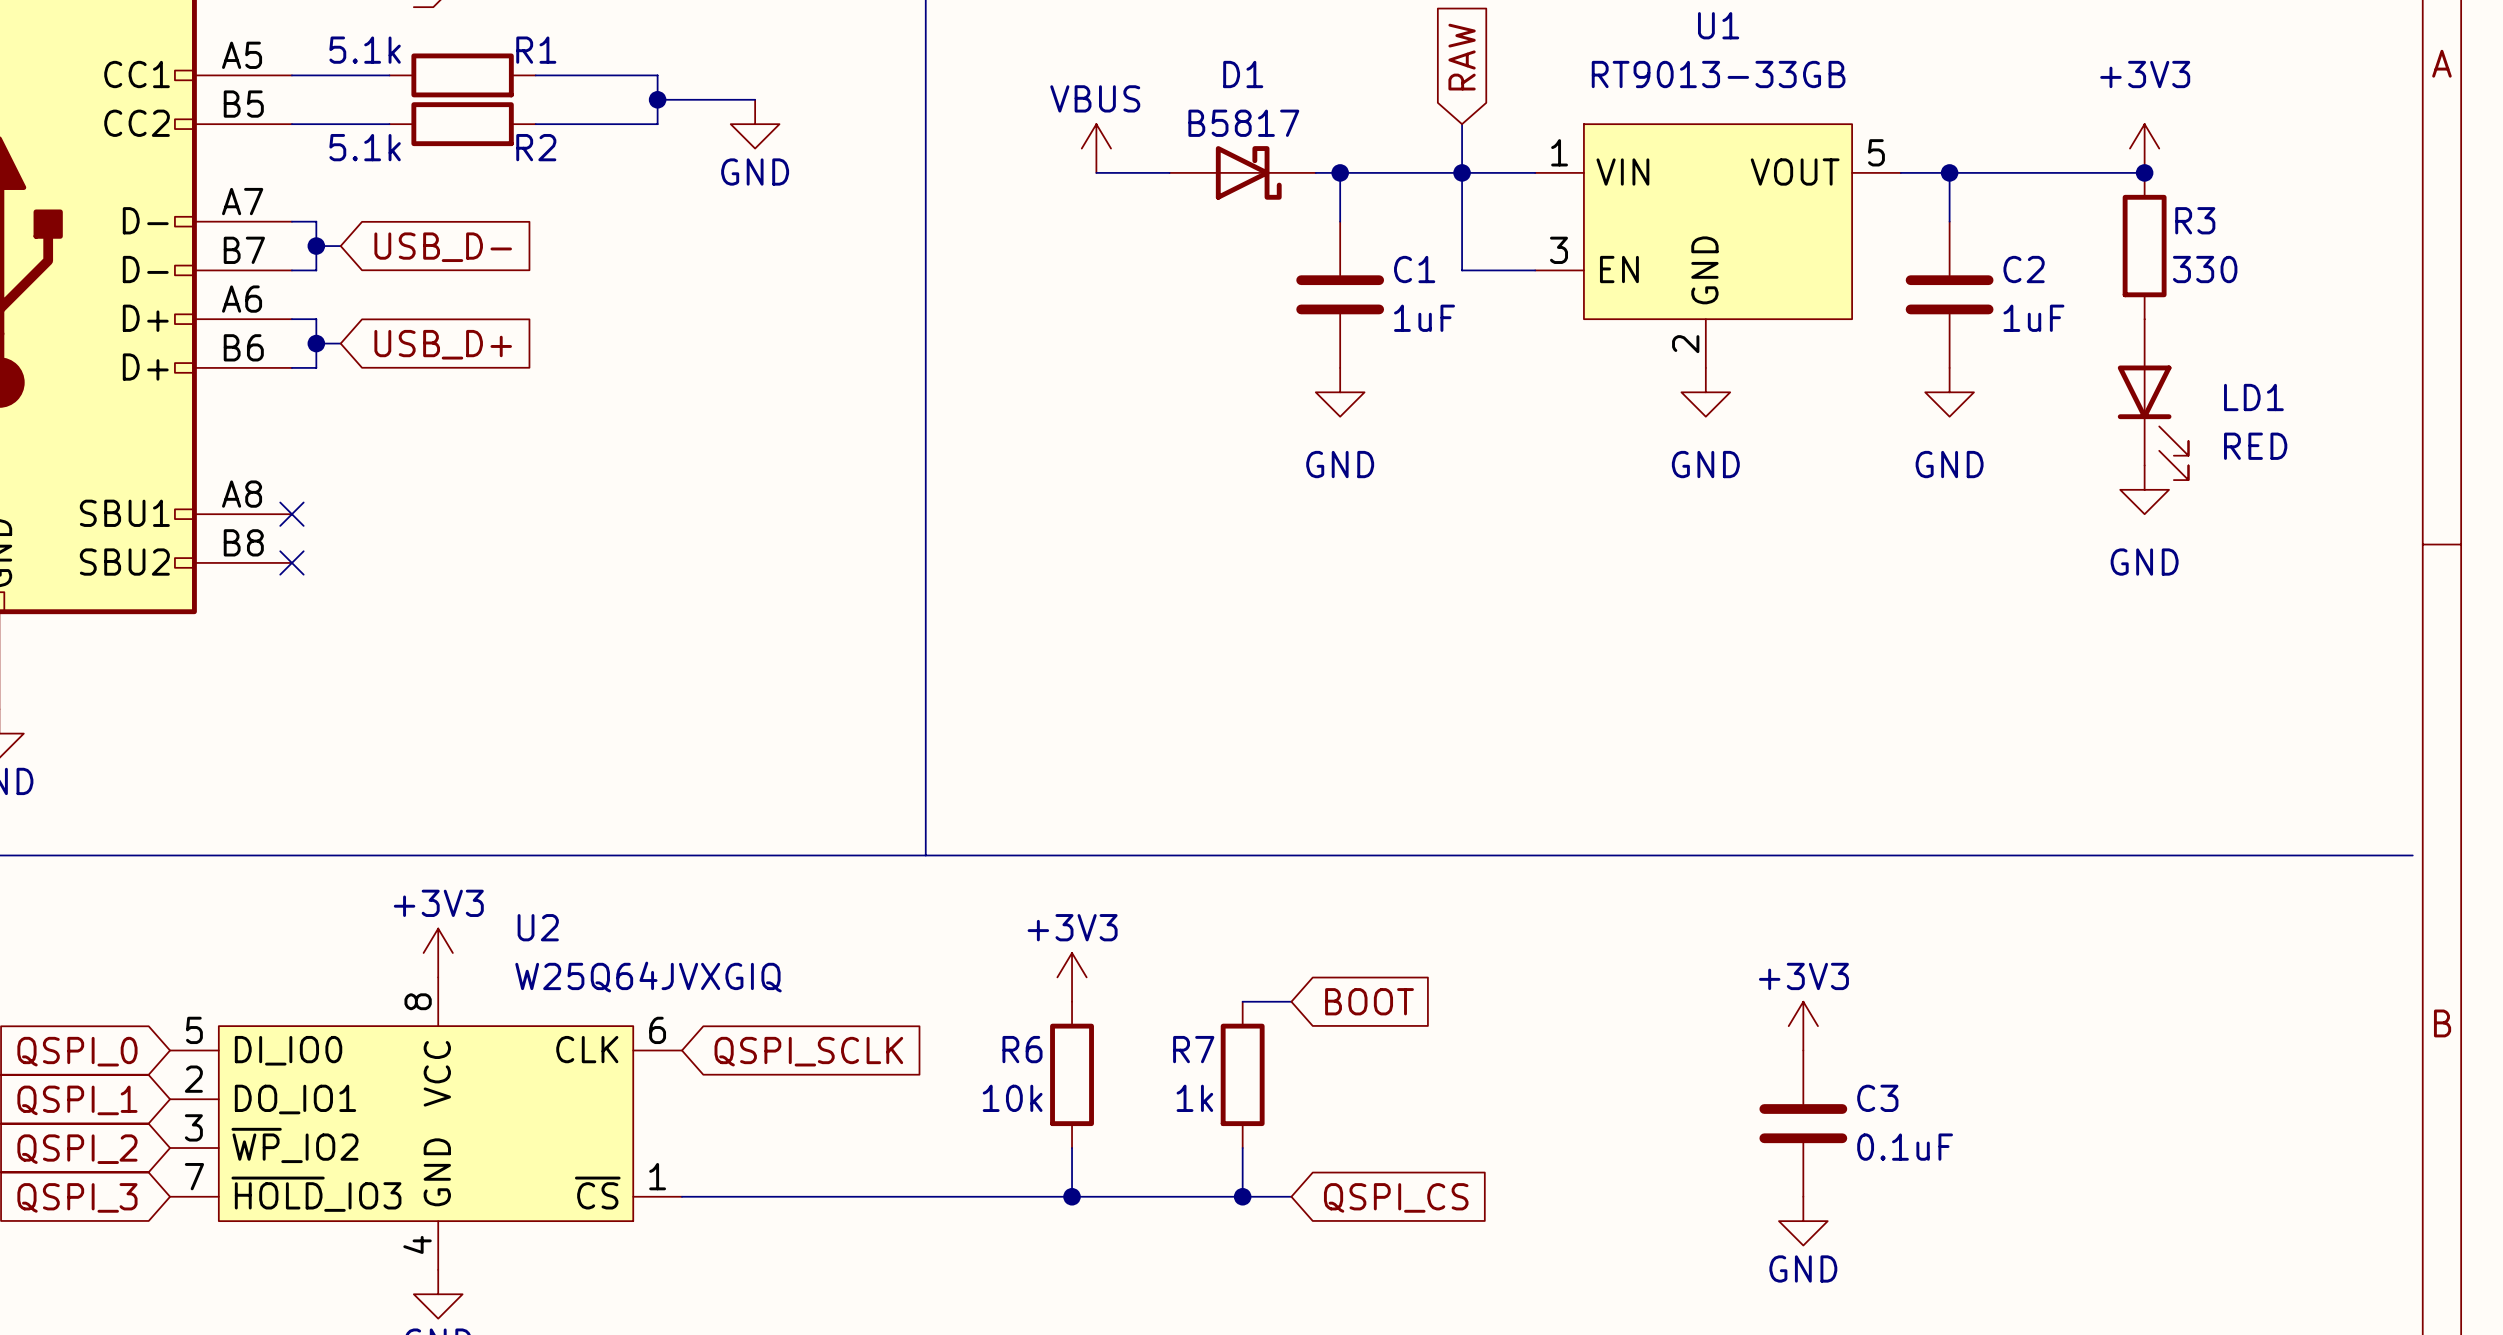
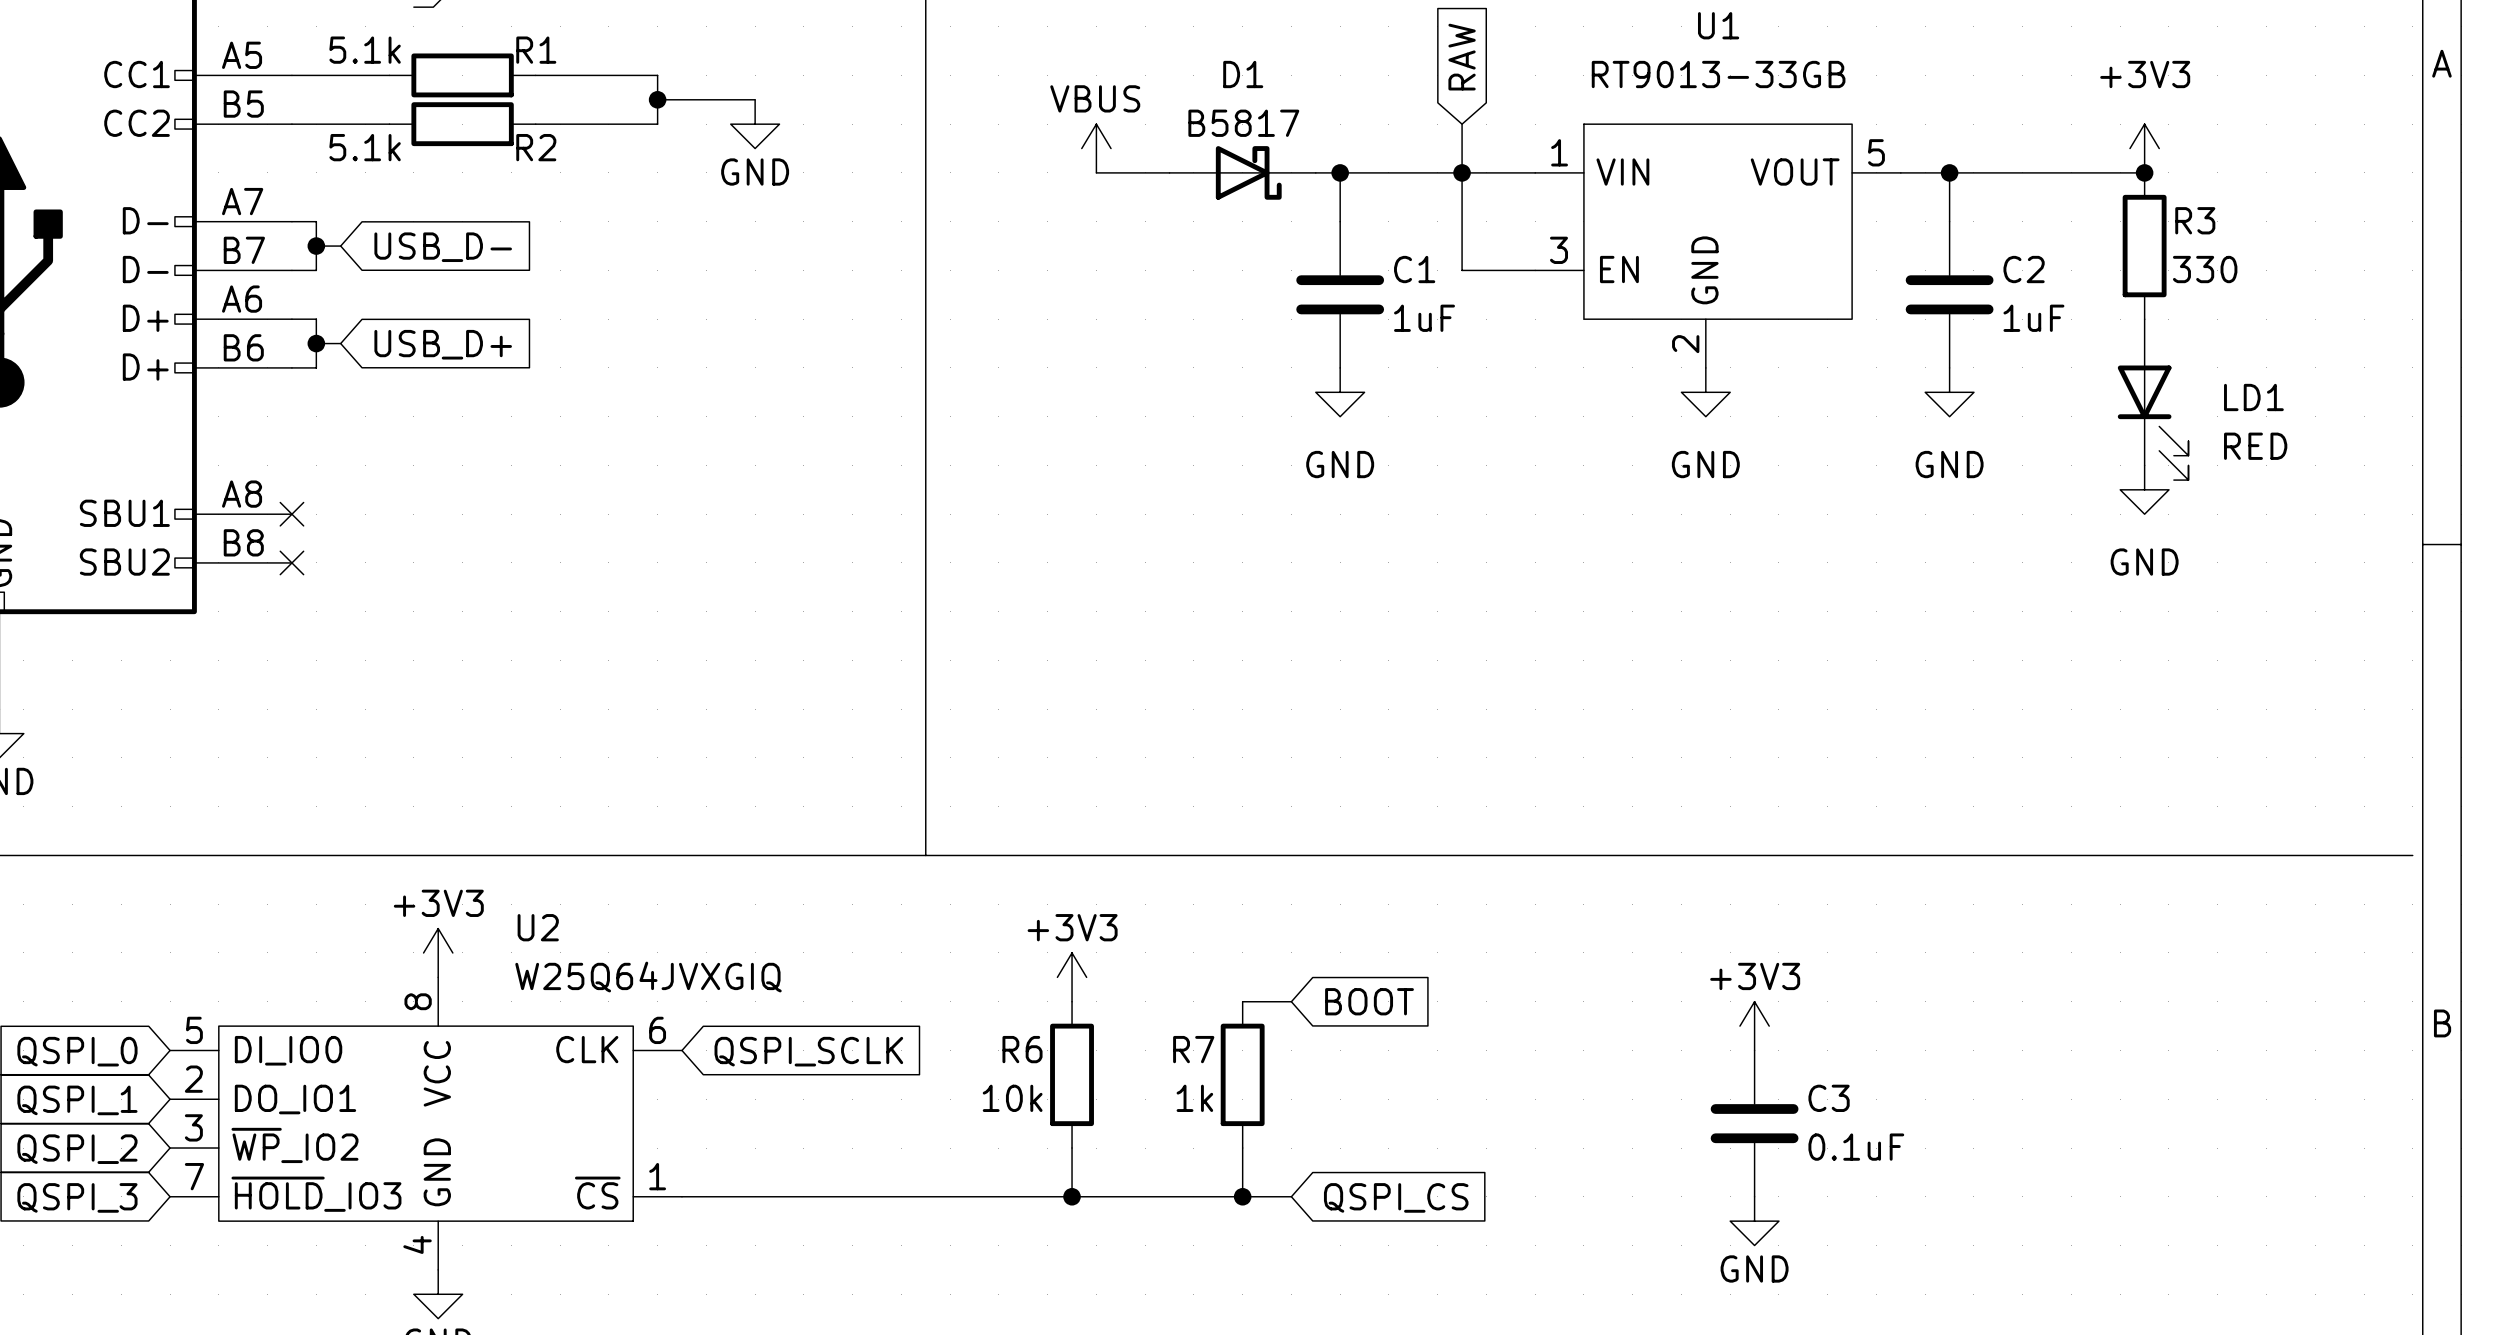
power symbol position: +3V3 (1803, 1026) -> +3V3 (1754, 1026)
C3 position: (1803, 1123) -> (1754, 1123)
power symbol position: GND (1803, 1221) -> GND (1754, 1221)

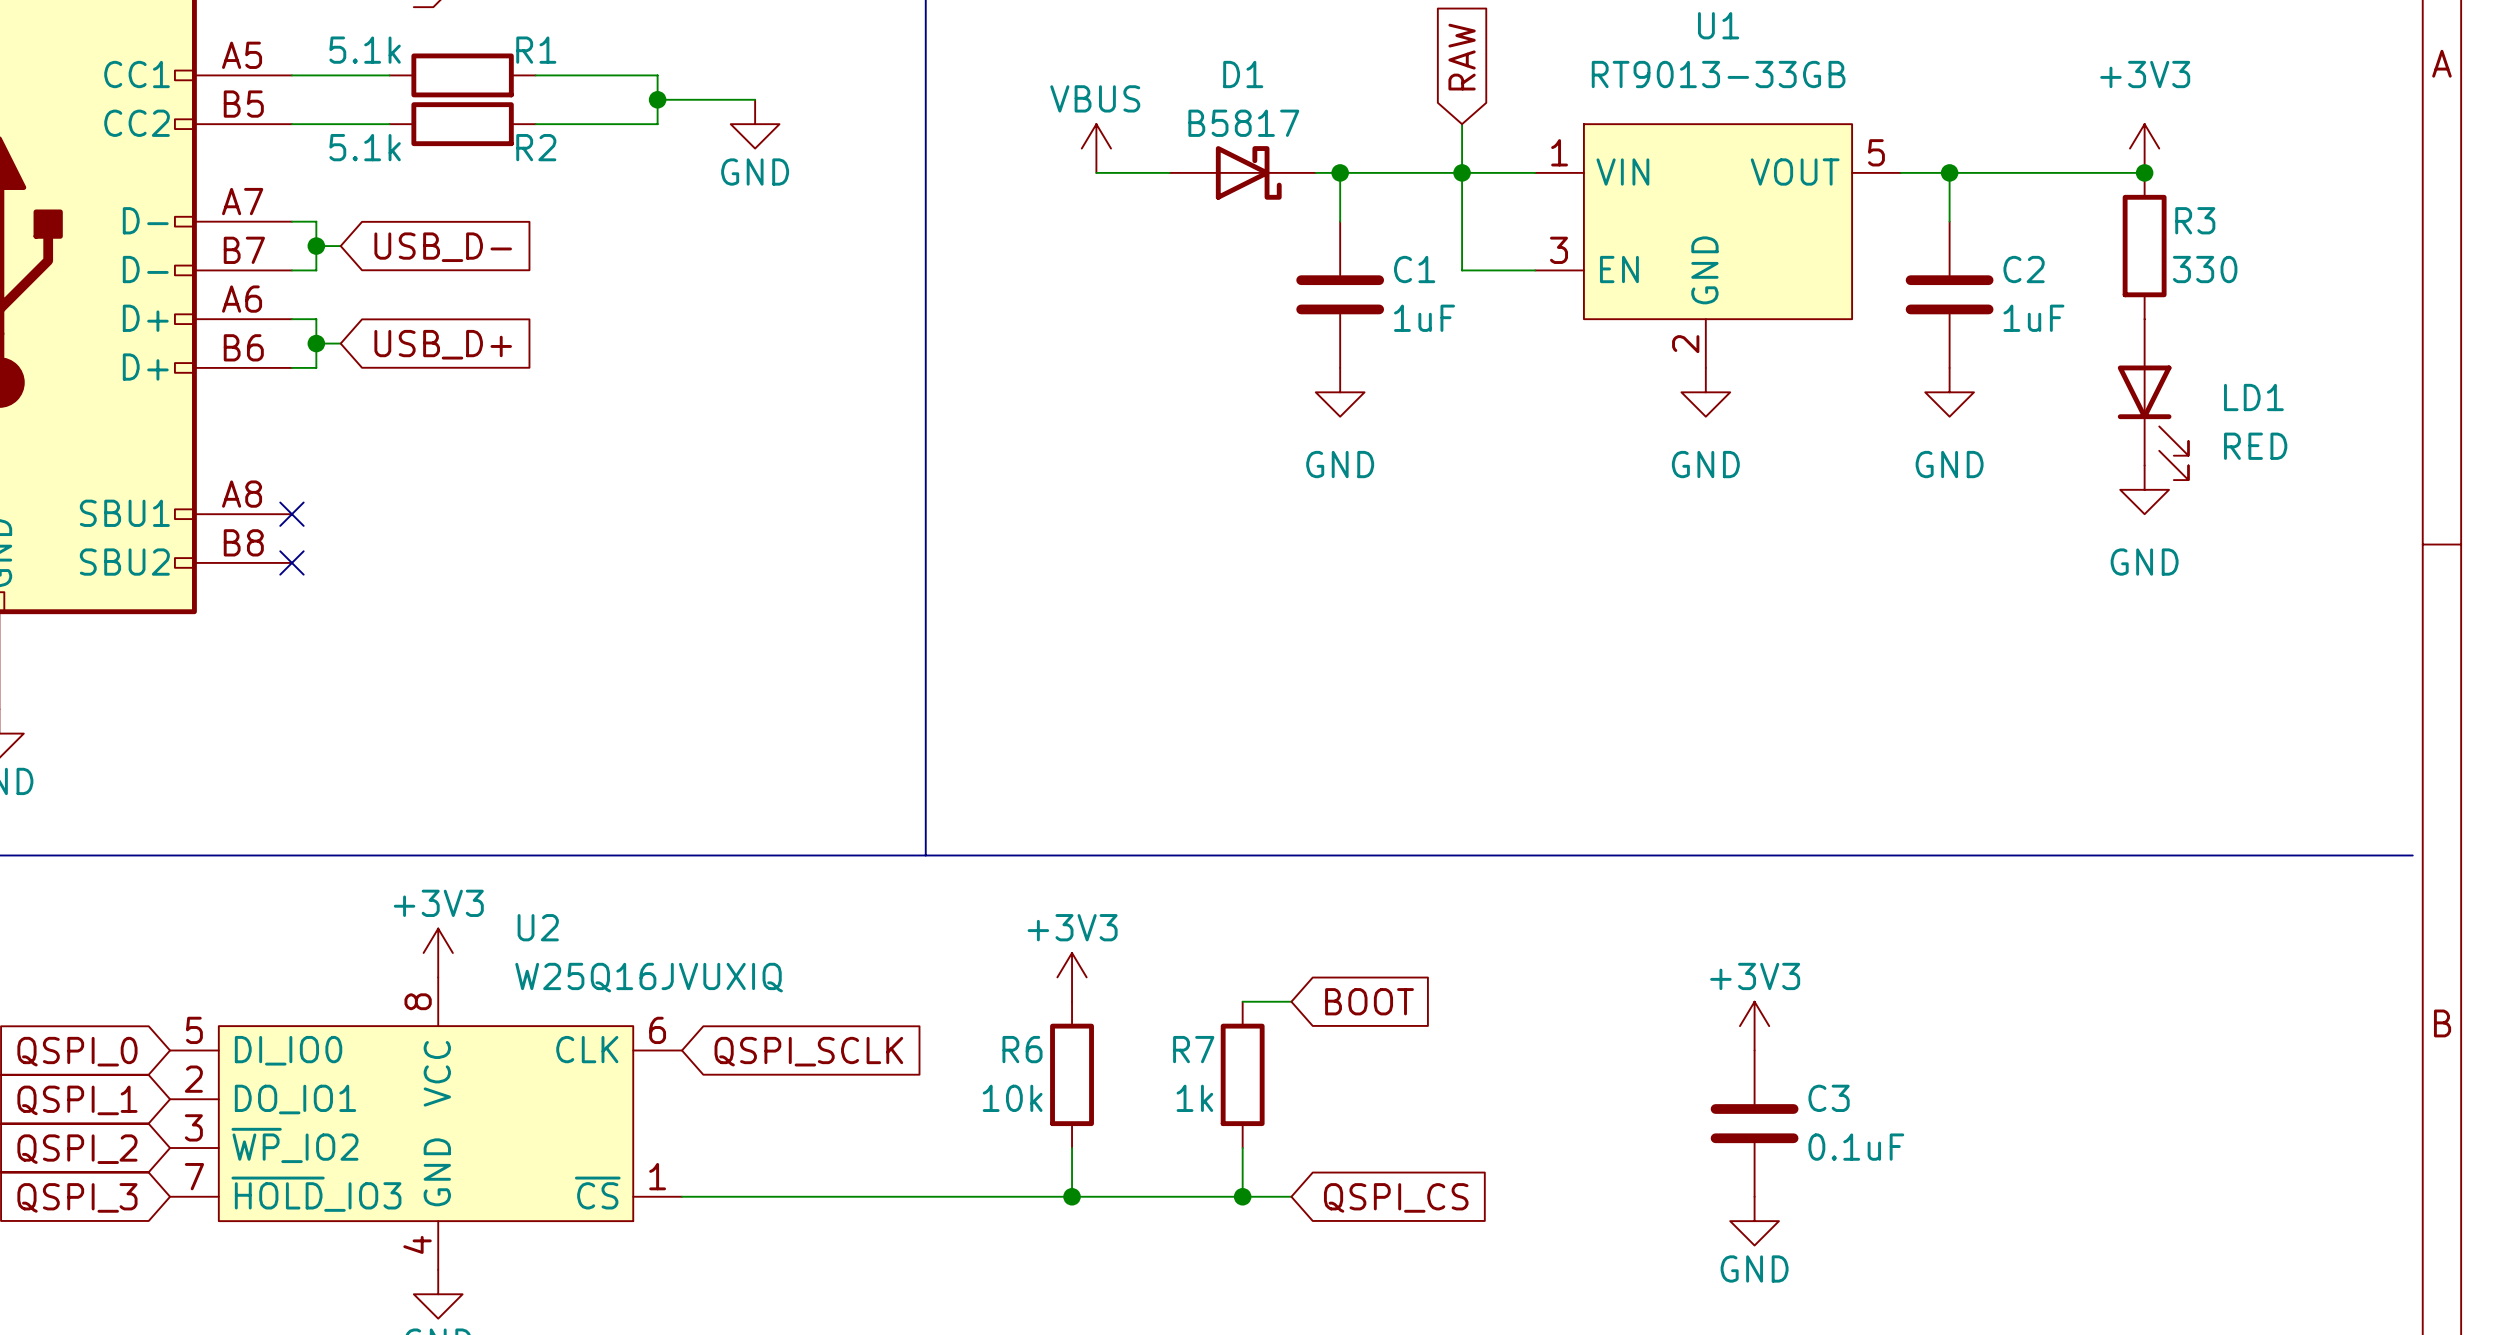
U2 value: W25Q64JVXGIQ (648, 977) -> W25Q16JVUXIQ (649, 977)

